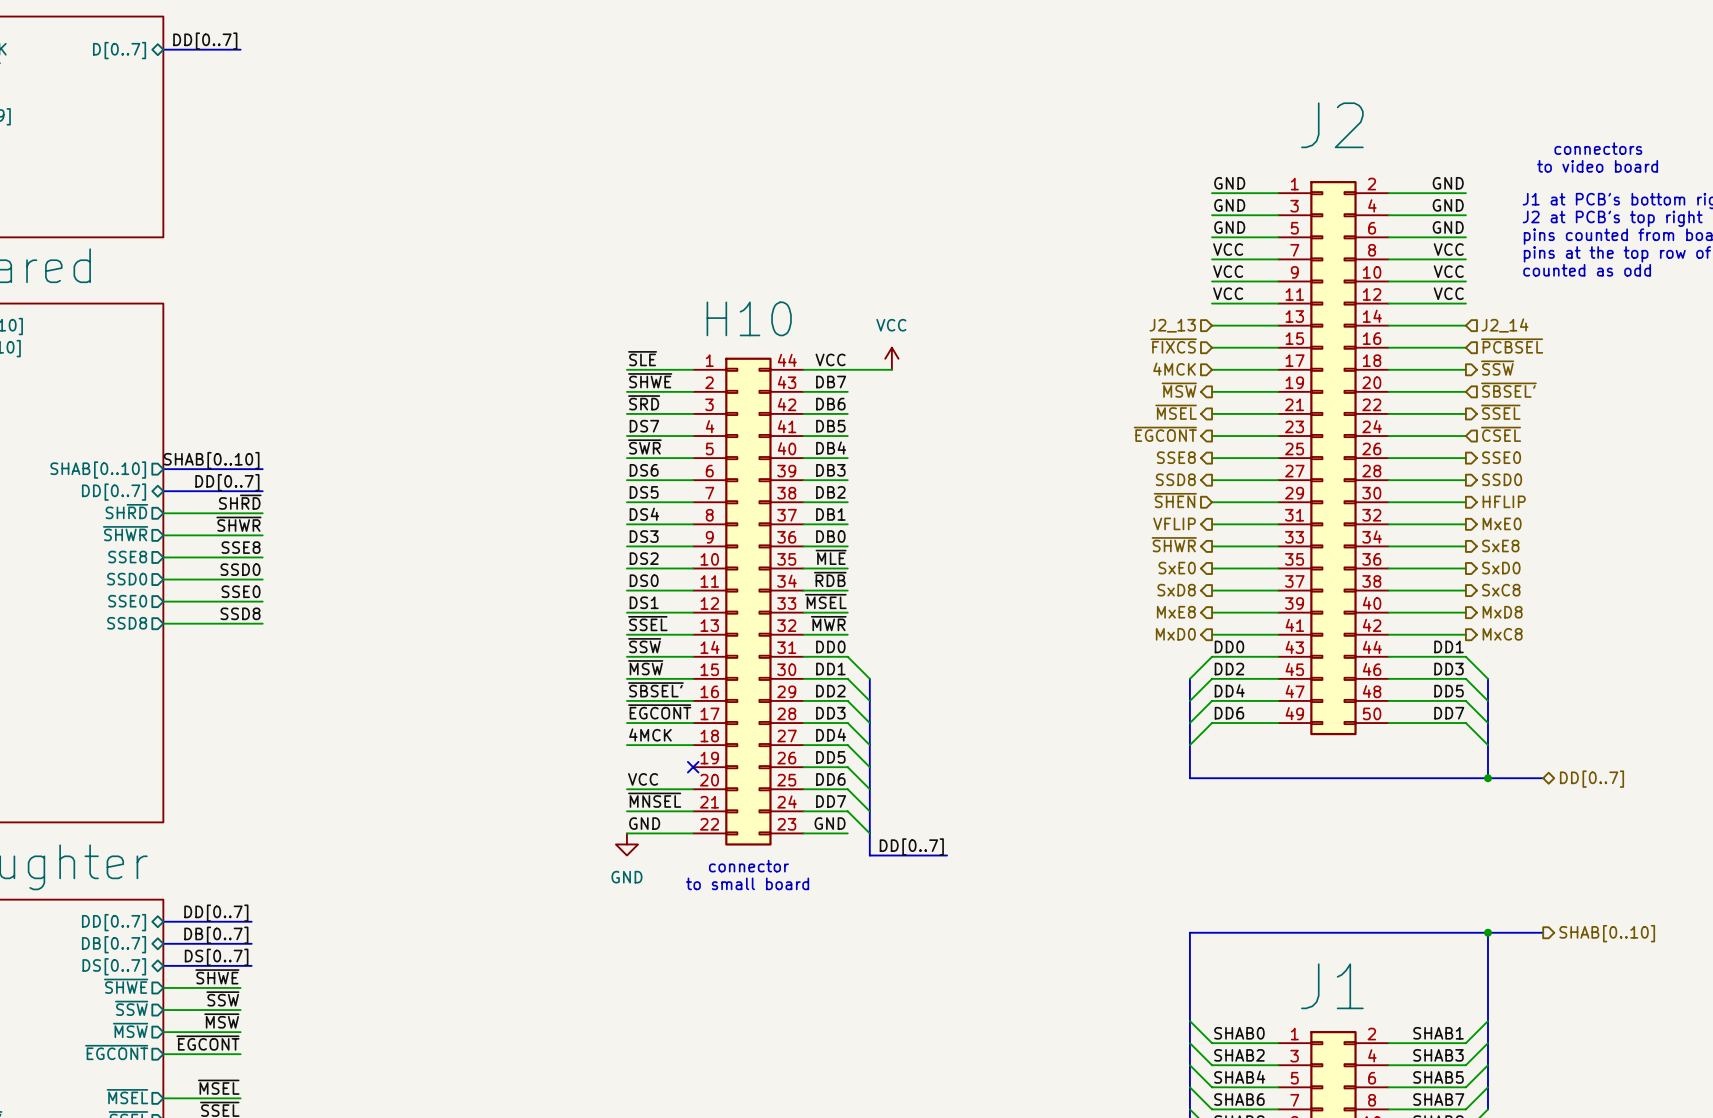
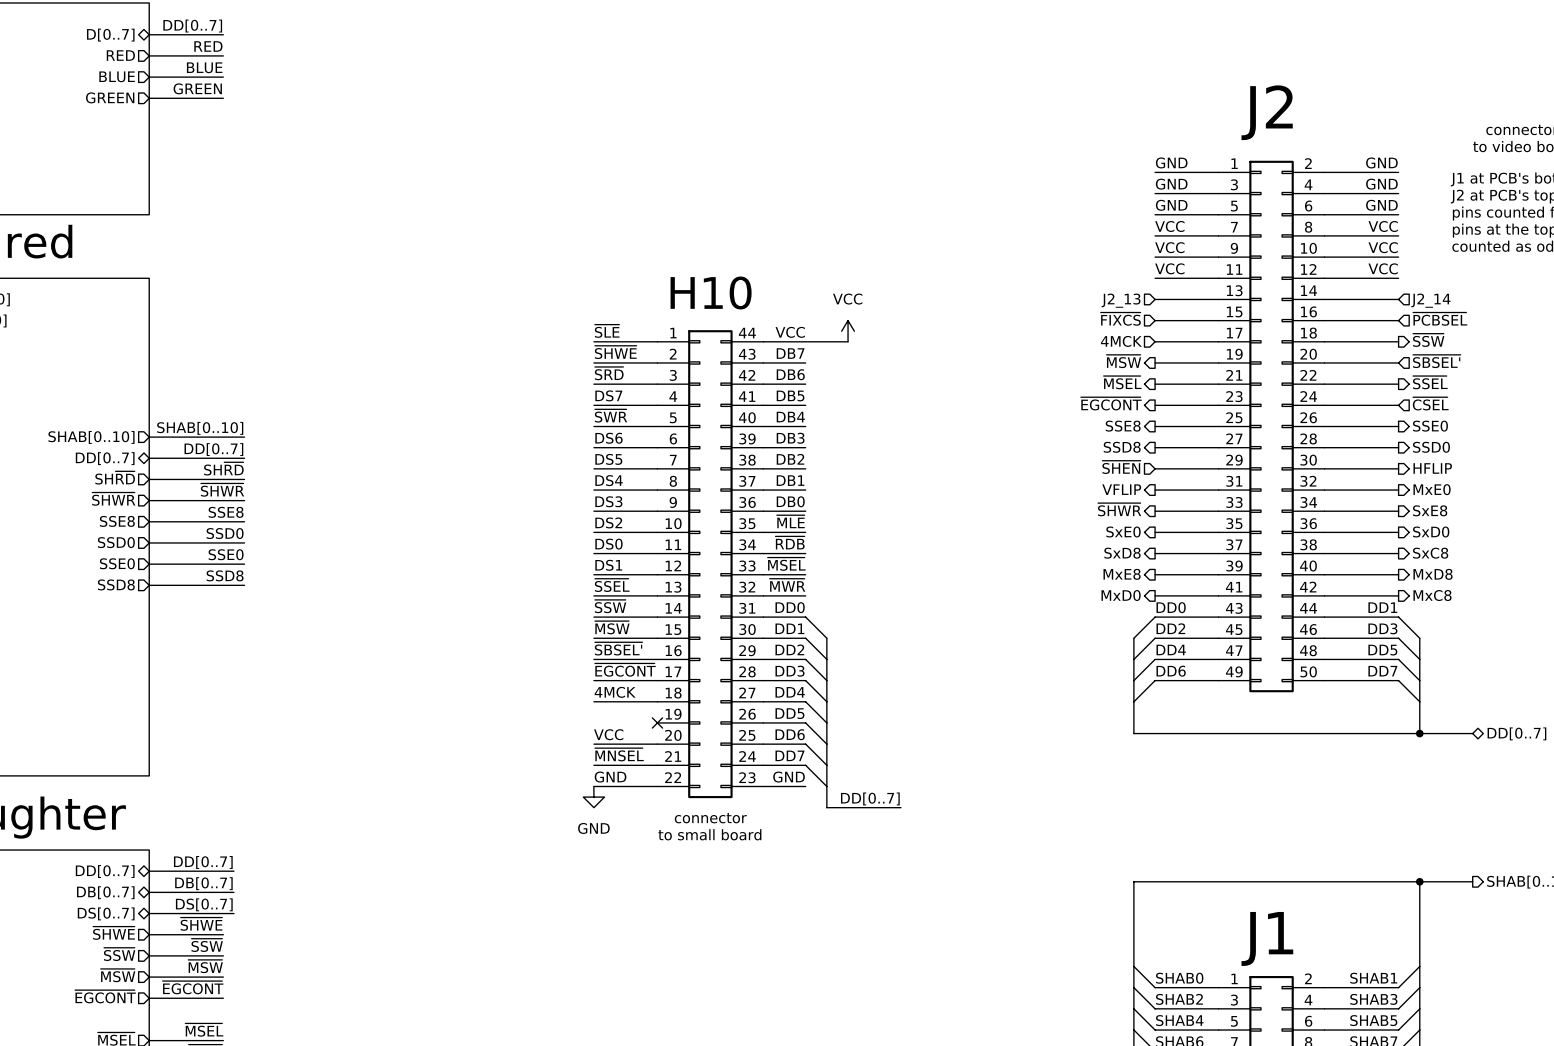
label: none -> RED (208, 46)
sheet pin: none -> RED (120, 55)
wire: none -> (149, 55) (223, 55)
label: none -> BLUE (204, 67)
sheet pin: none -> BLUE (117, 76)
wire: none -> (149, 77) (223, 77)
label: none -> GREEN (197, 88)
sheet pin: none -> GREEN (110, 97)
wire: none -> (149, 98) (223, 98)

